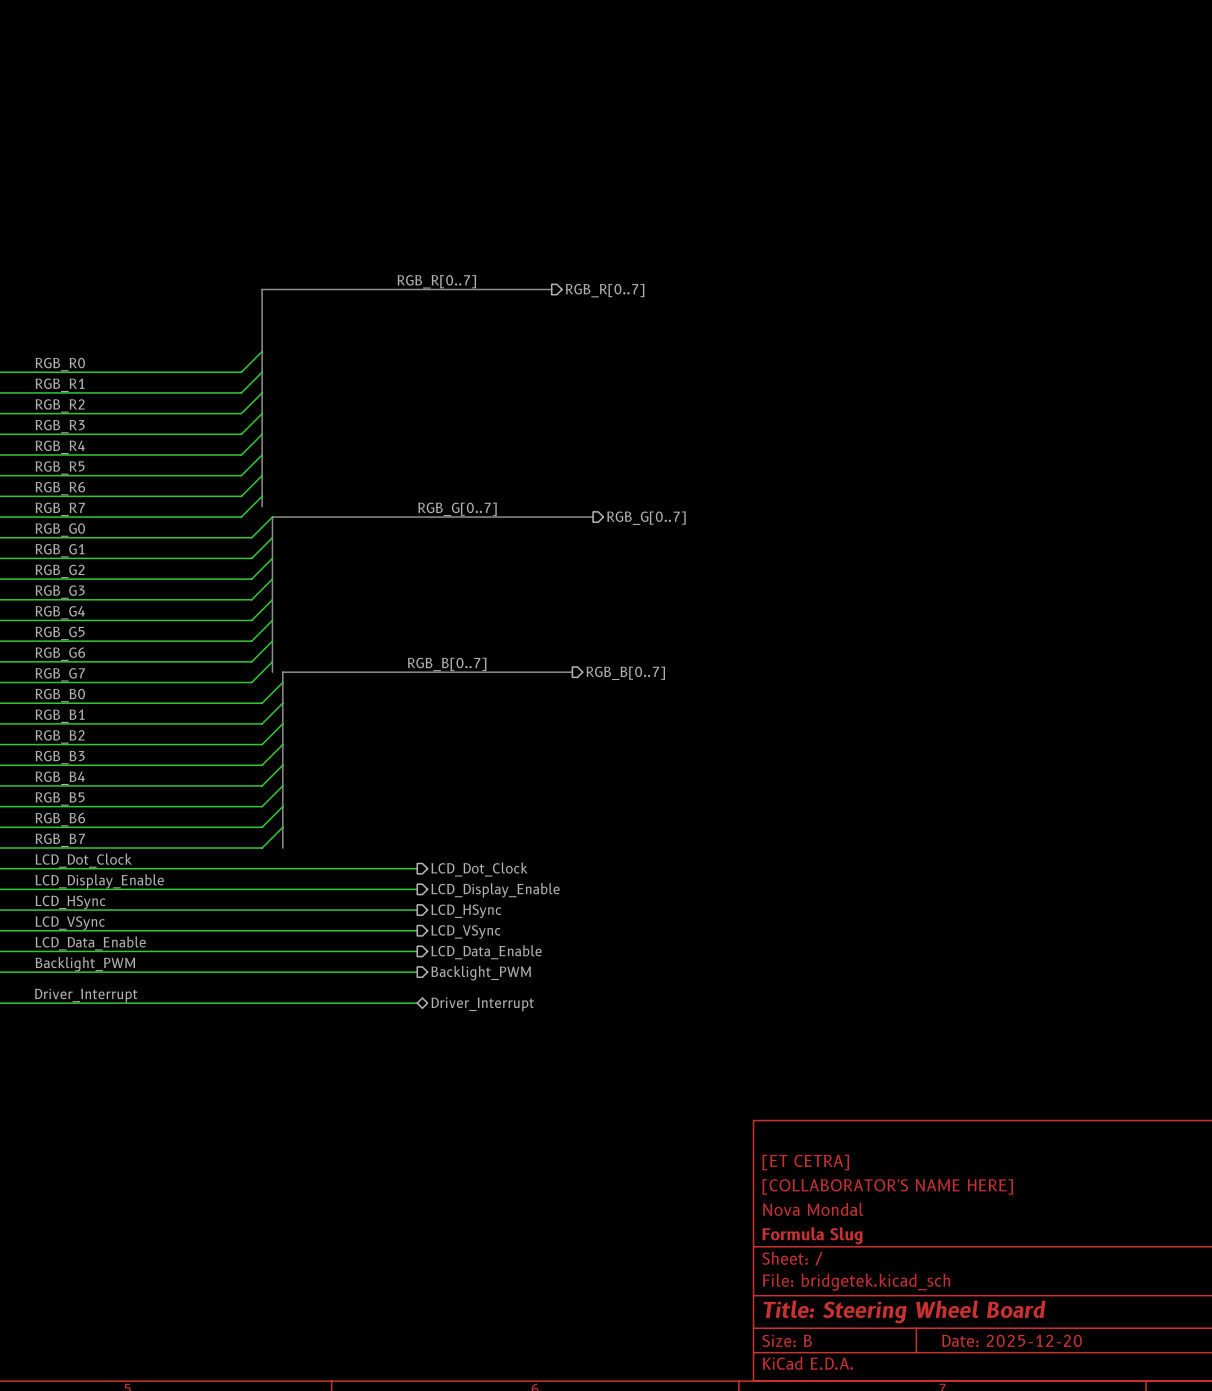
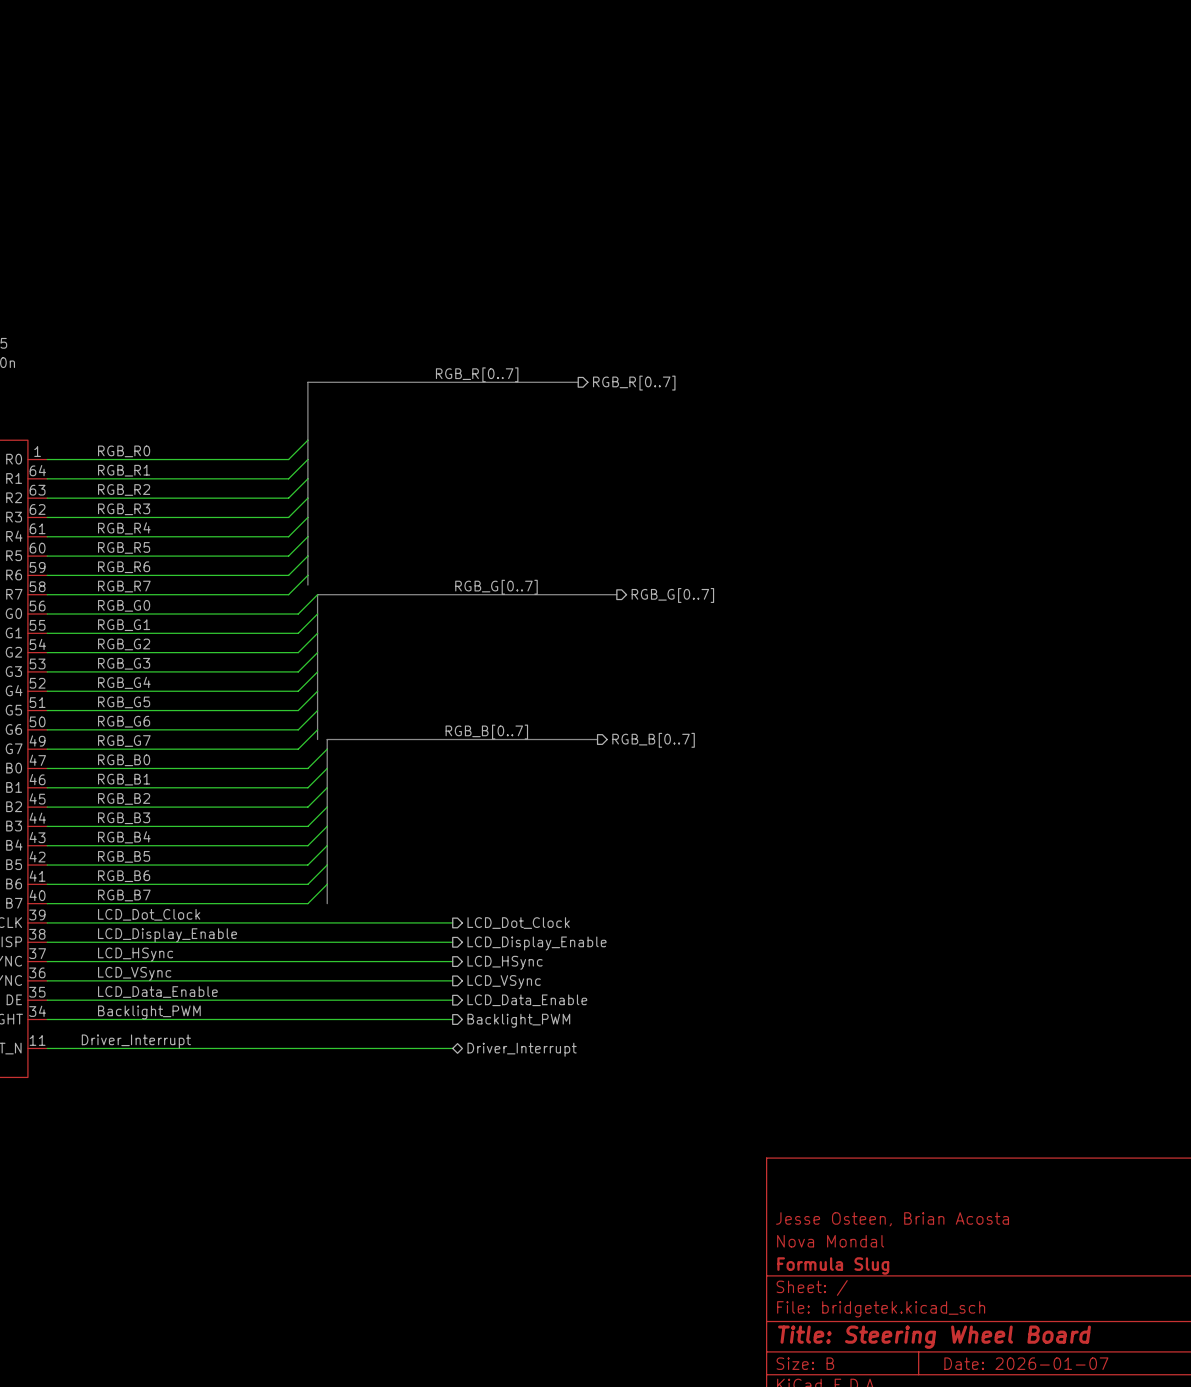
title block: [ET CETRA] (805, 1162) -> none
title block: [COLLABORATOR'S NAME HERE] (887, 1186) -> Jesse Osteen, Brian Acosta (892, 1219)
title block: Date: 2025-12-20 (1012, 1340) -> Date: 2026-01-07 (1026, 1363)

